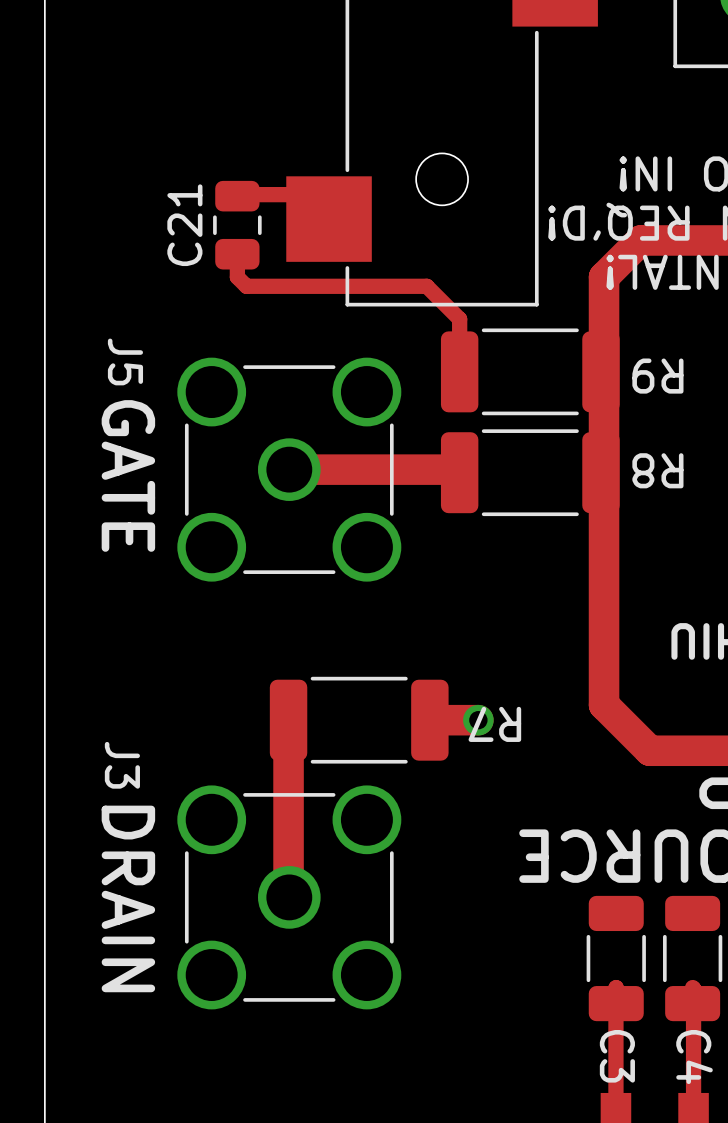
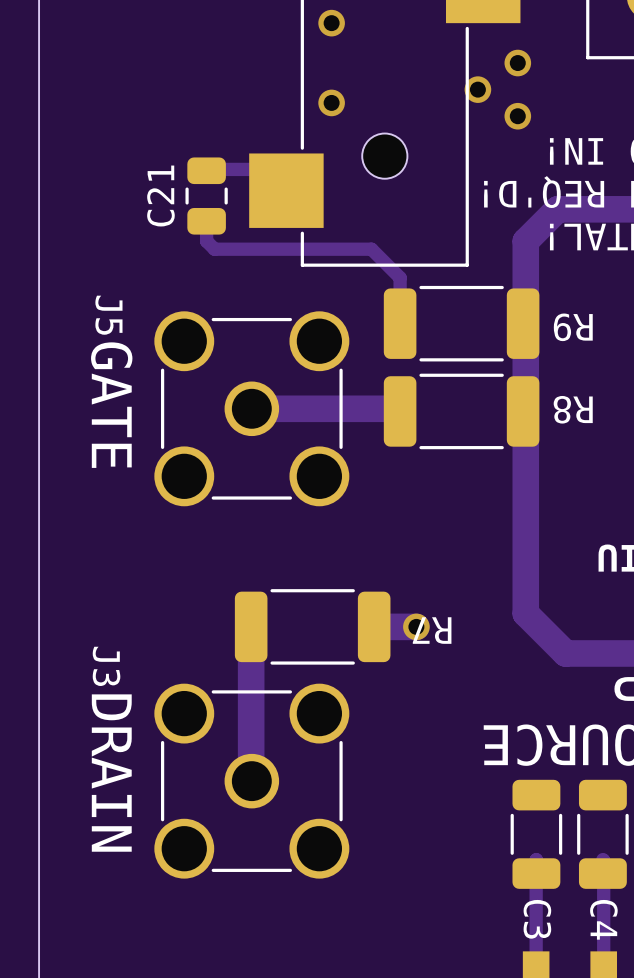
via: none -> (331, 23)
via: none -> (517, 63)
via: none -> (477, 89)
via: none -> (331, 102)
via: none -> (517, 116)

